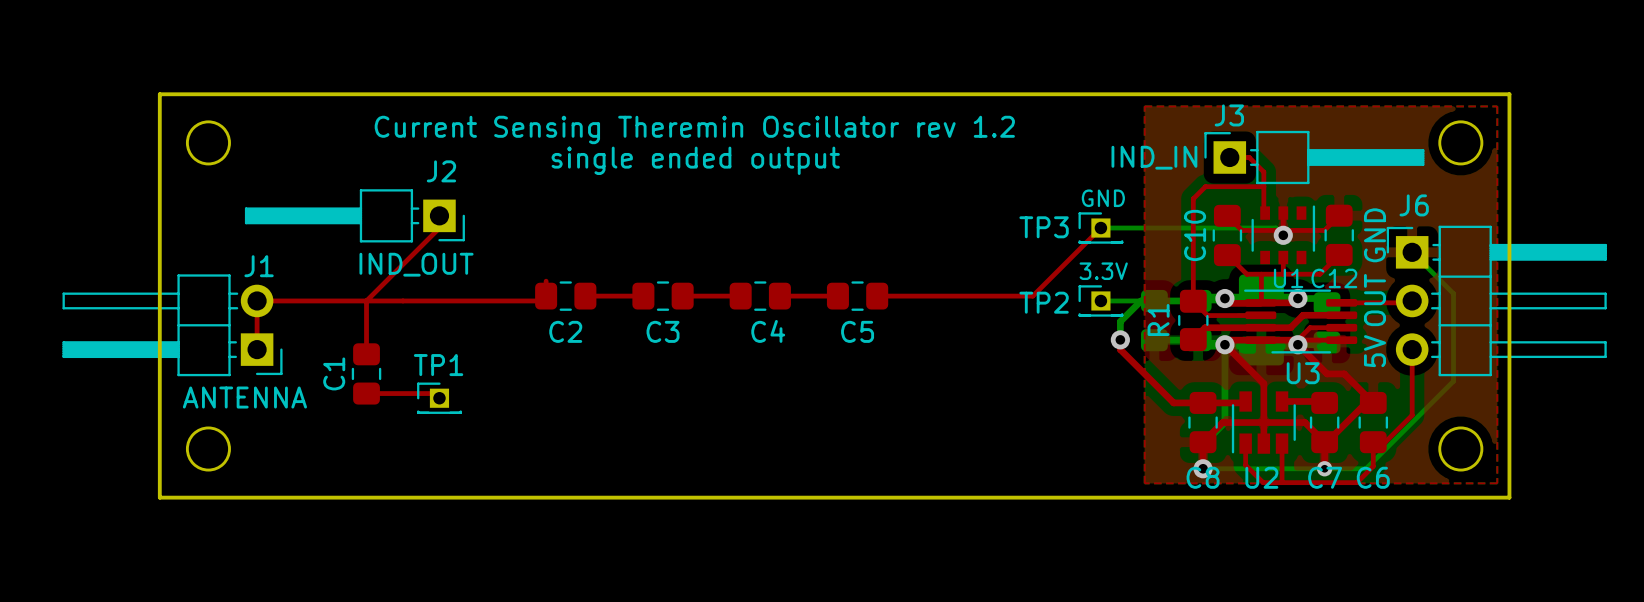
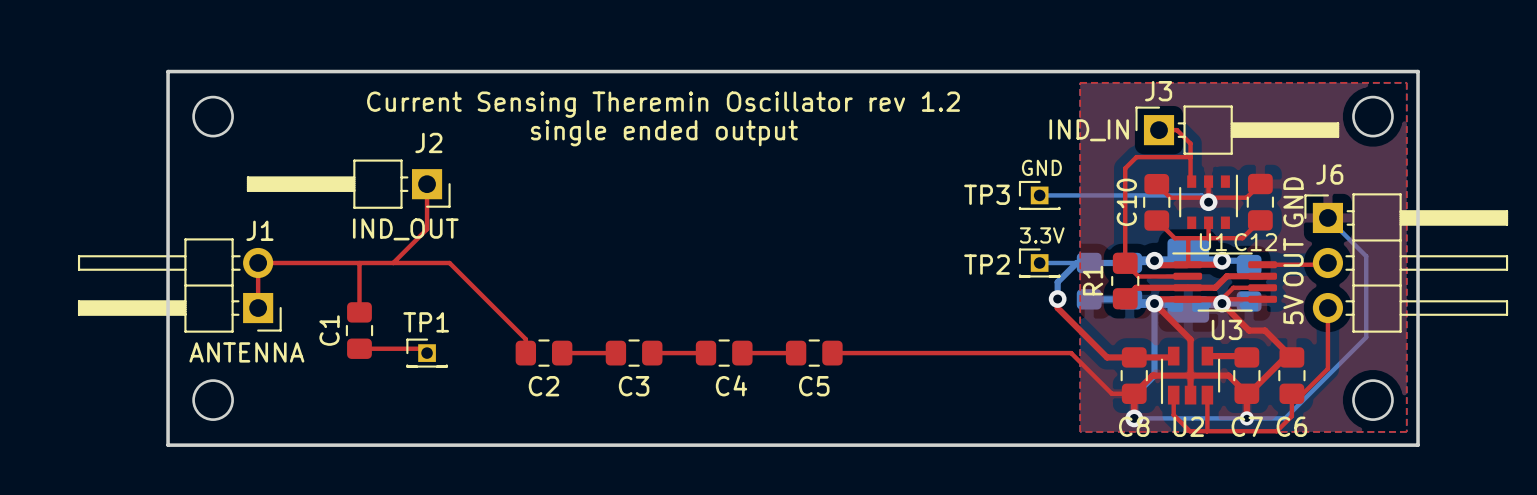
top track: (439, 228) (366, 300) -> (427, 195) (427, 229) (393, 263)
top track: (1100, 228) (1032, 296) (877, 296) -> none
top track: (546, 281) (546, 296) (541, 300) (463, 300) -> (525, 353) (525, 339) (449, 263)
C2 position: (565, 296) -> (544, 353)
top track: (585, 296) (643, 296) -> (562, 353) (615, 353)
C3 position: (663, 296) -> (634, 353)
top track: (682, 296) (740, 296) -> (652, 353) (706, 353)
C4 position: (760, 296) -> (724, 353)
top track: (779, 296) (837, 296) -> (742, 353) (796, 353)
C5 position: (857, 296) -> (814, 353)
top track: none -> (832, 353) (1071, 353) (1111, 393) (1134, 393)

